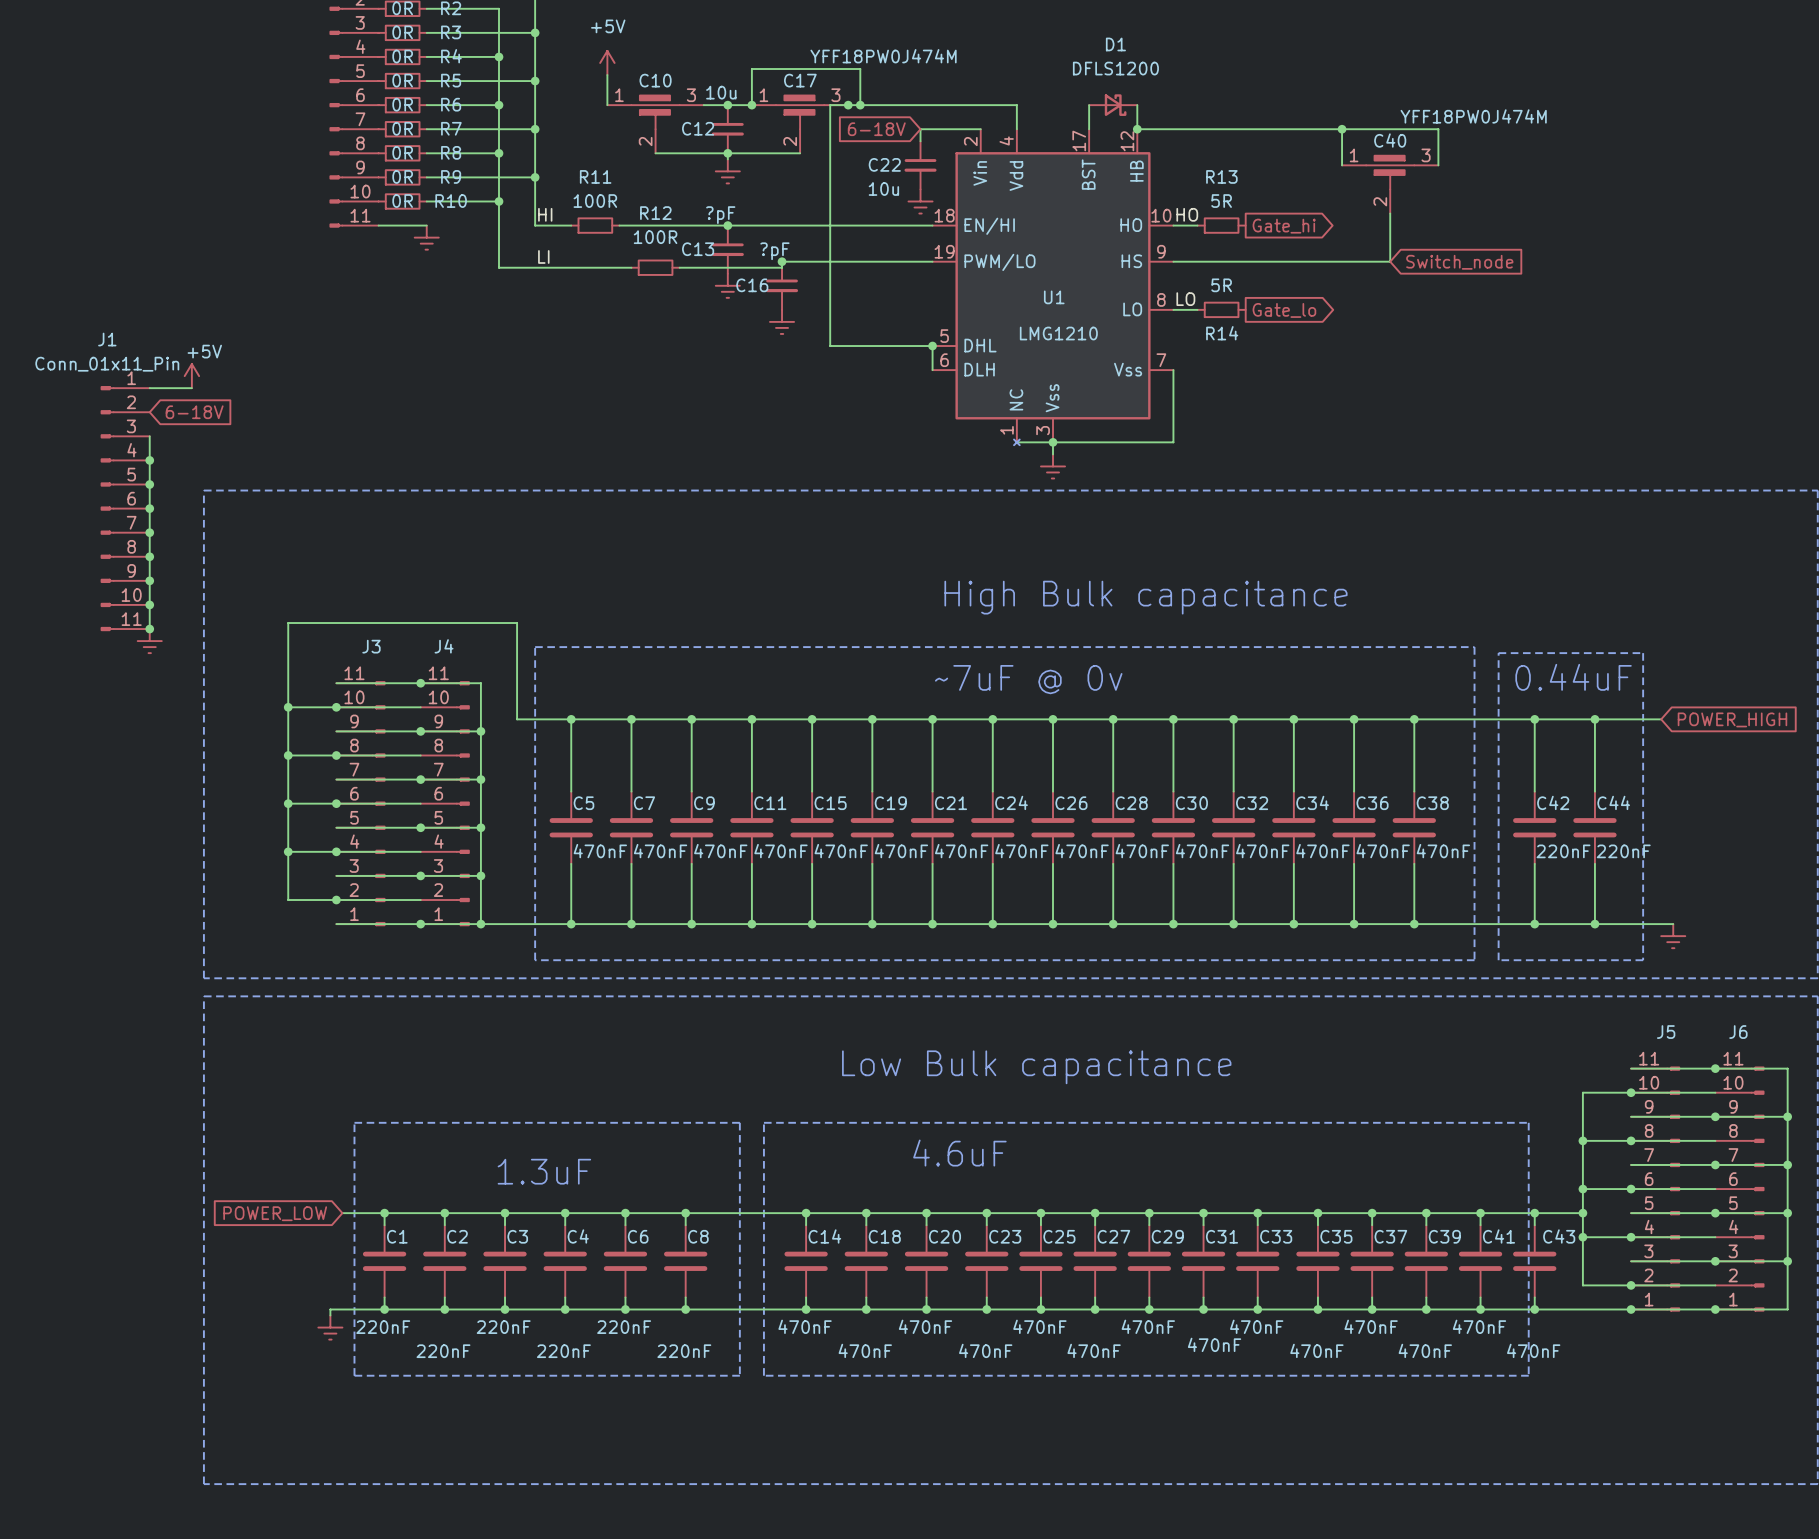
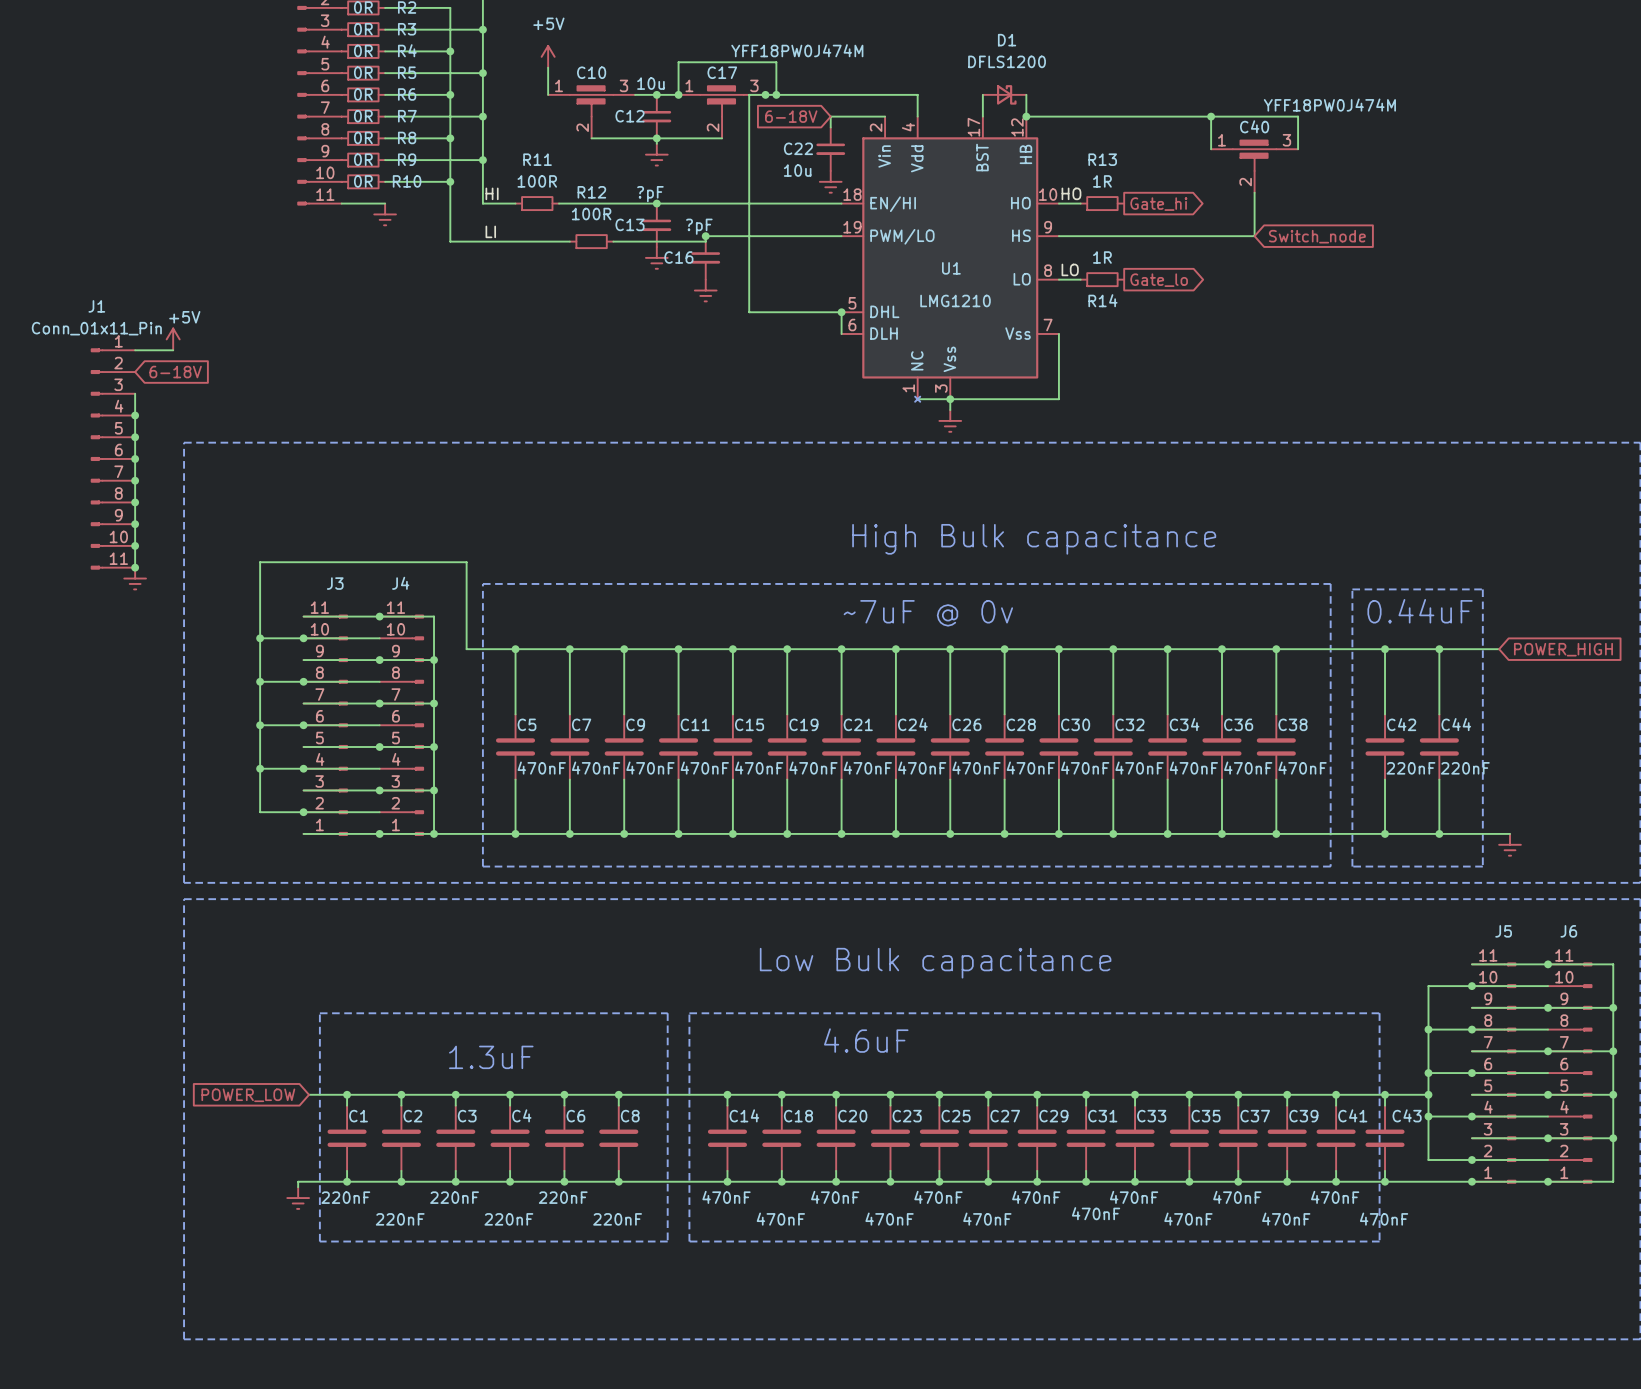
R13 value: 5R (1221, 201) -> 1R (1102, 181)
R14 value: 5R (1221, 285) -> 1R (1102, 257)

